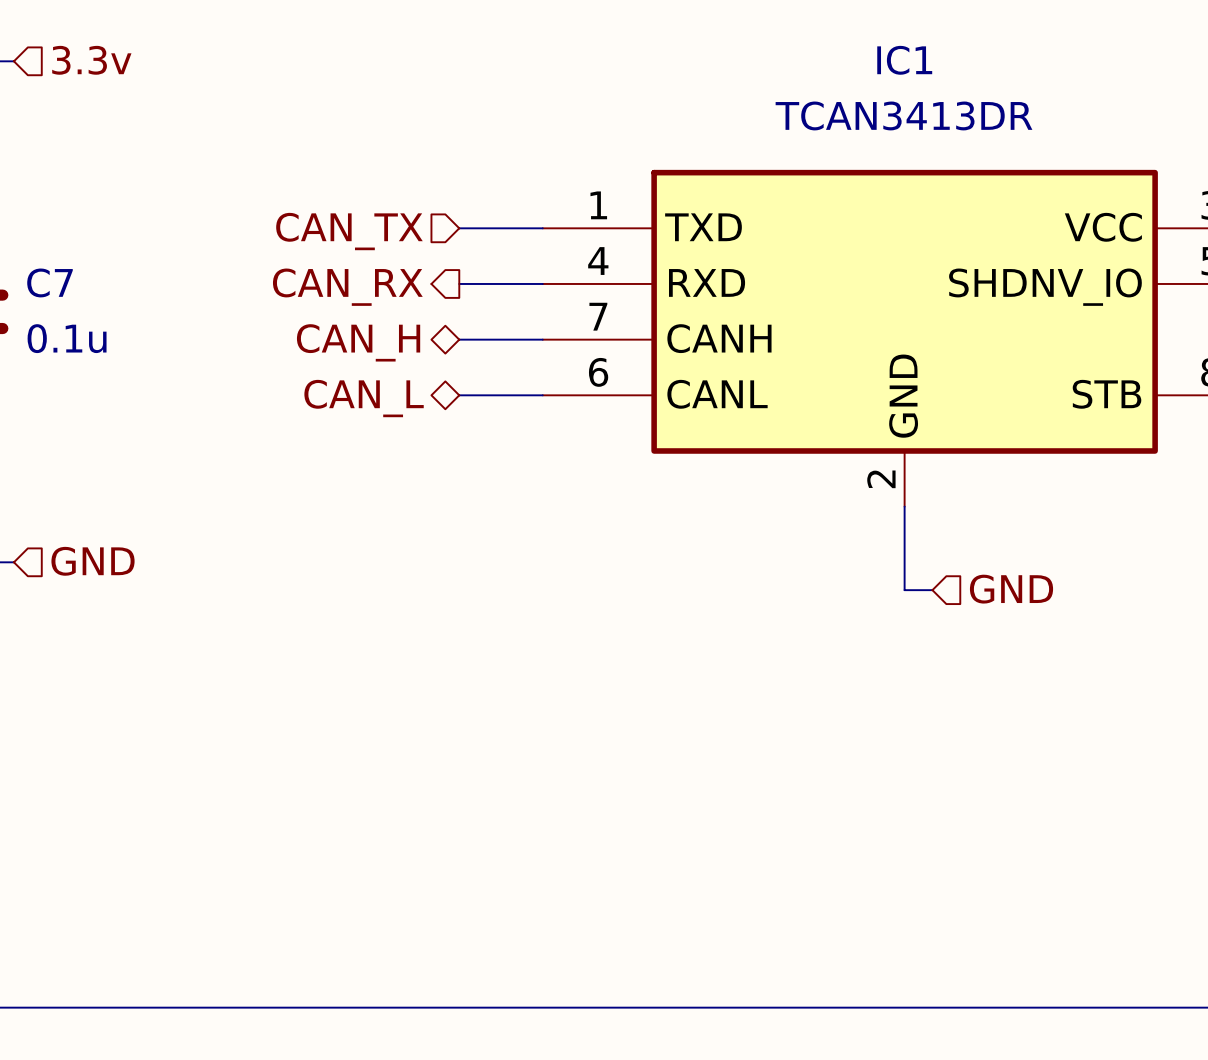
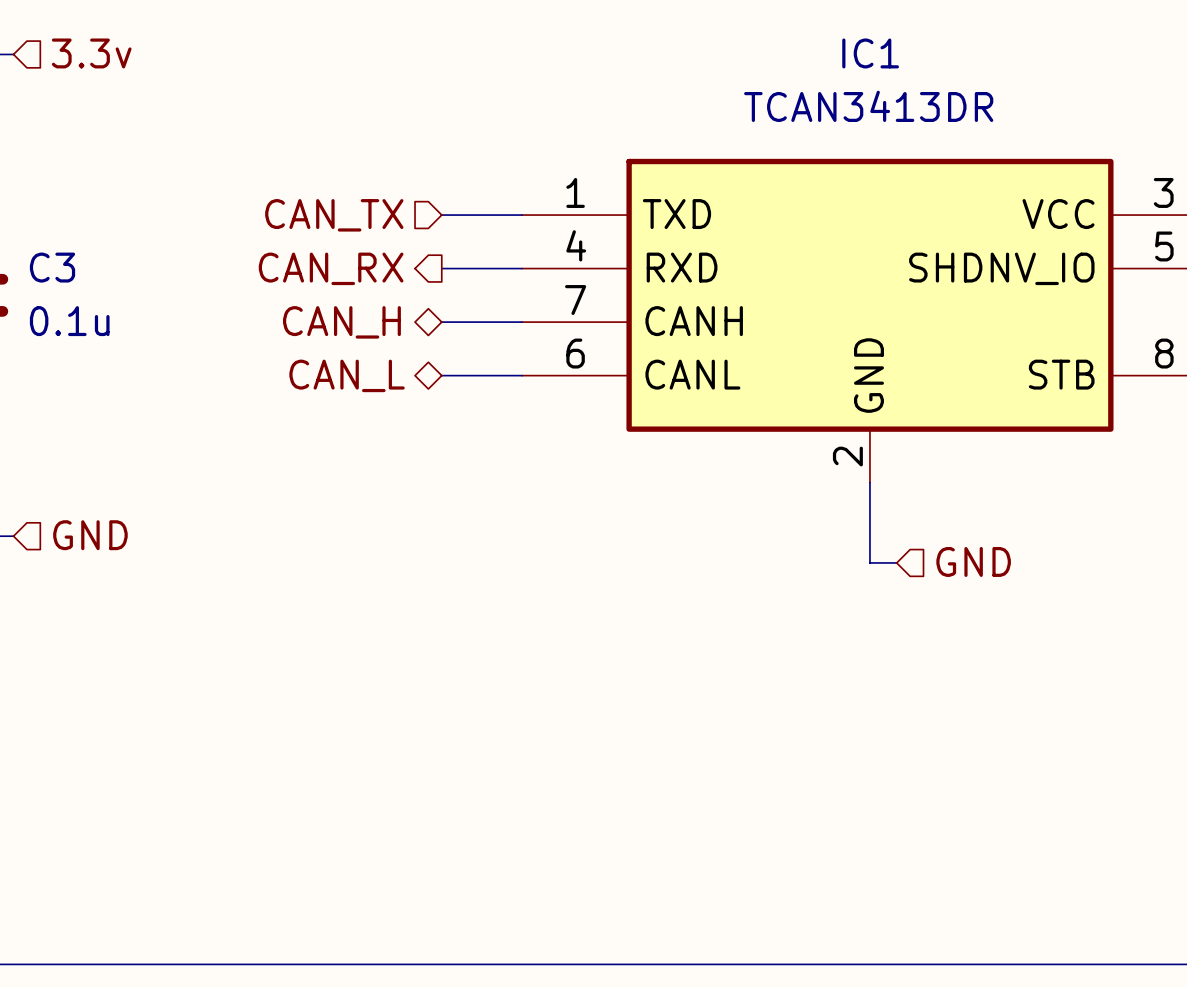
C7 name: C7 (49, 282) -> C3 (52, 267)

